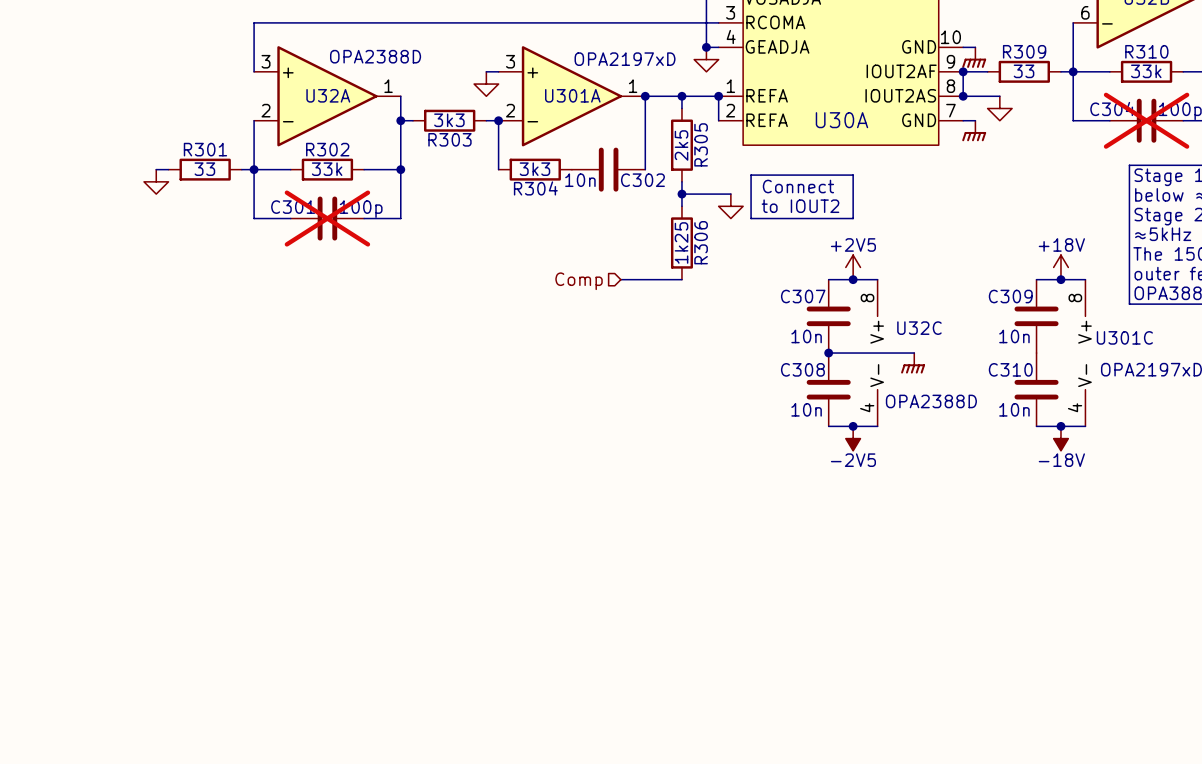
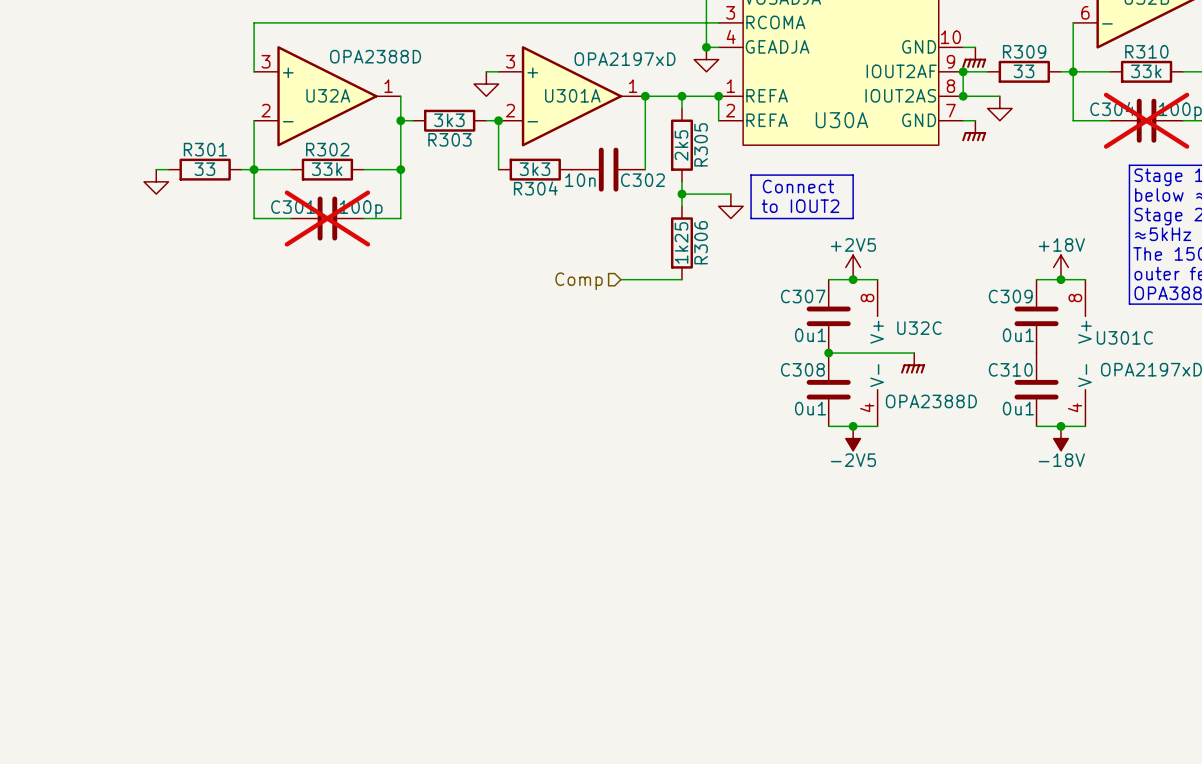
C307 value: 10n (806, 336) -> 0u1 (810, 335)
C309 value: 10n (1014, 336) -> 0u1 (1018, 335)
C308 value: 10n (806, 409) -> 0u1 (810, 408)
C310 value: 10n (1014, 409) -> 0u1 (1018, 408)

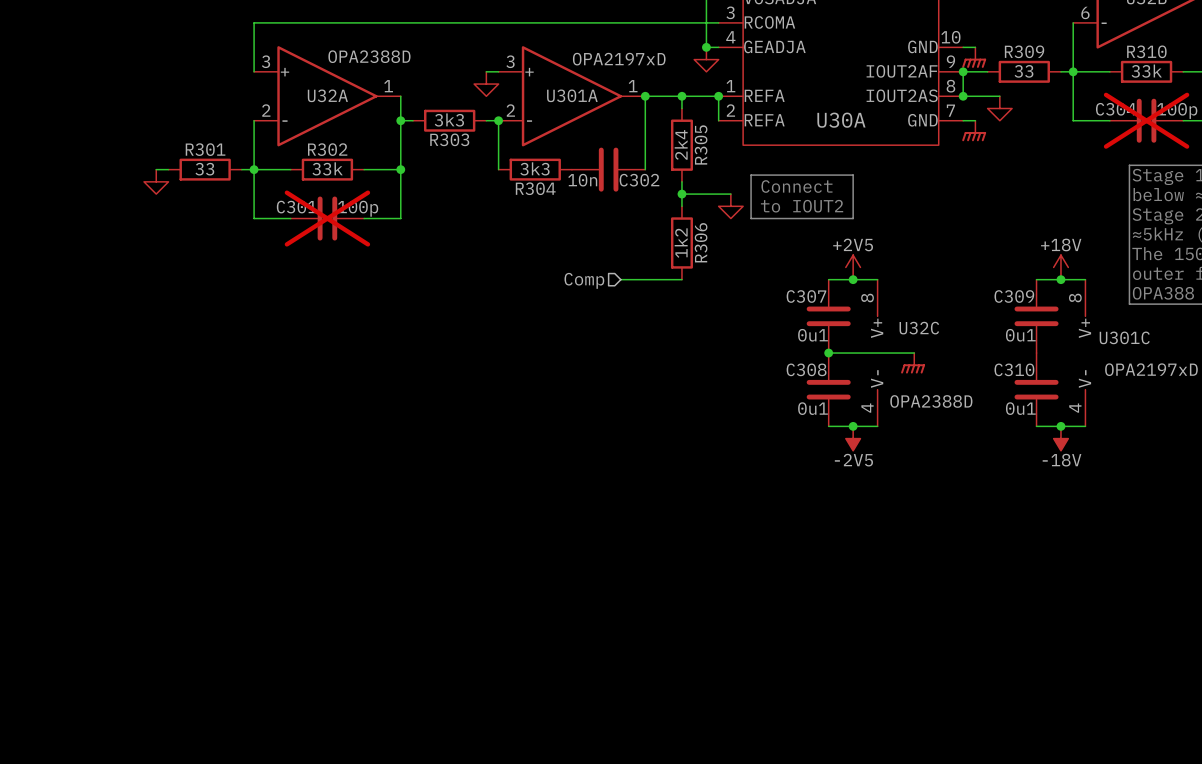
R305 value: 2k5 (681, 145) -> 2k4 (681, 144)
R306 value: 1k25 (681, 242) -> 1k2 (681, 243)

